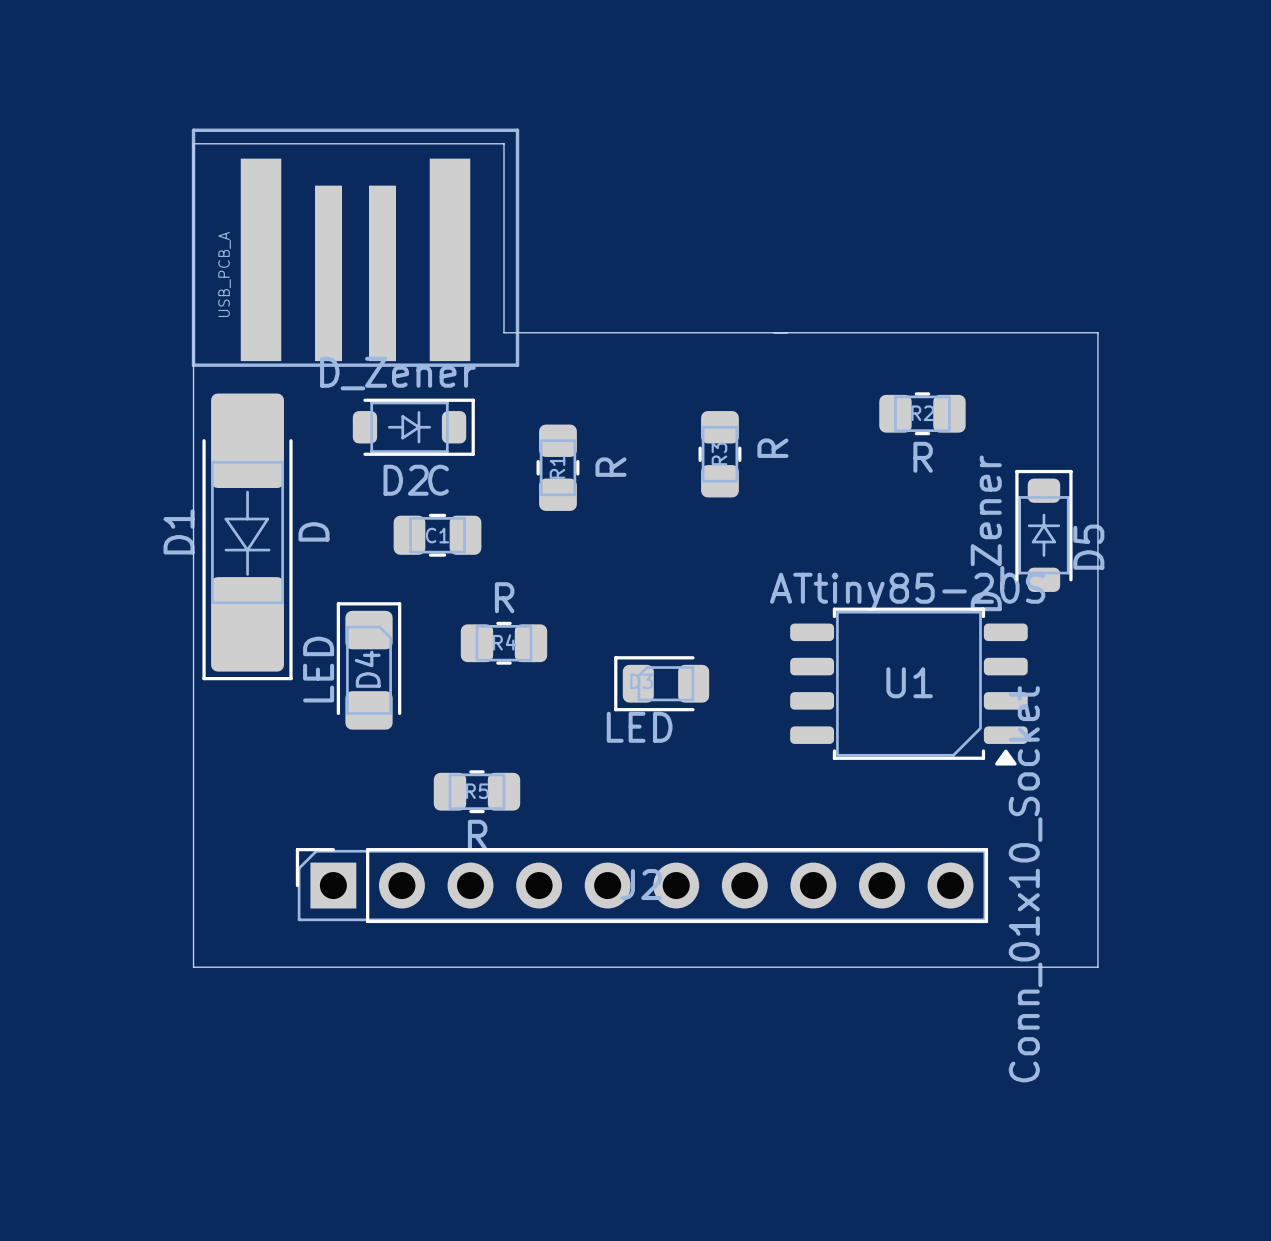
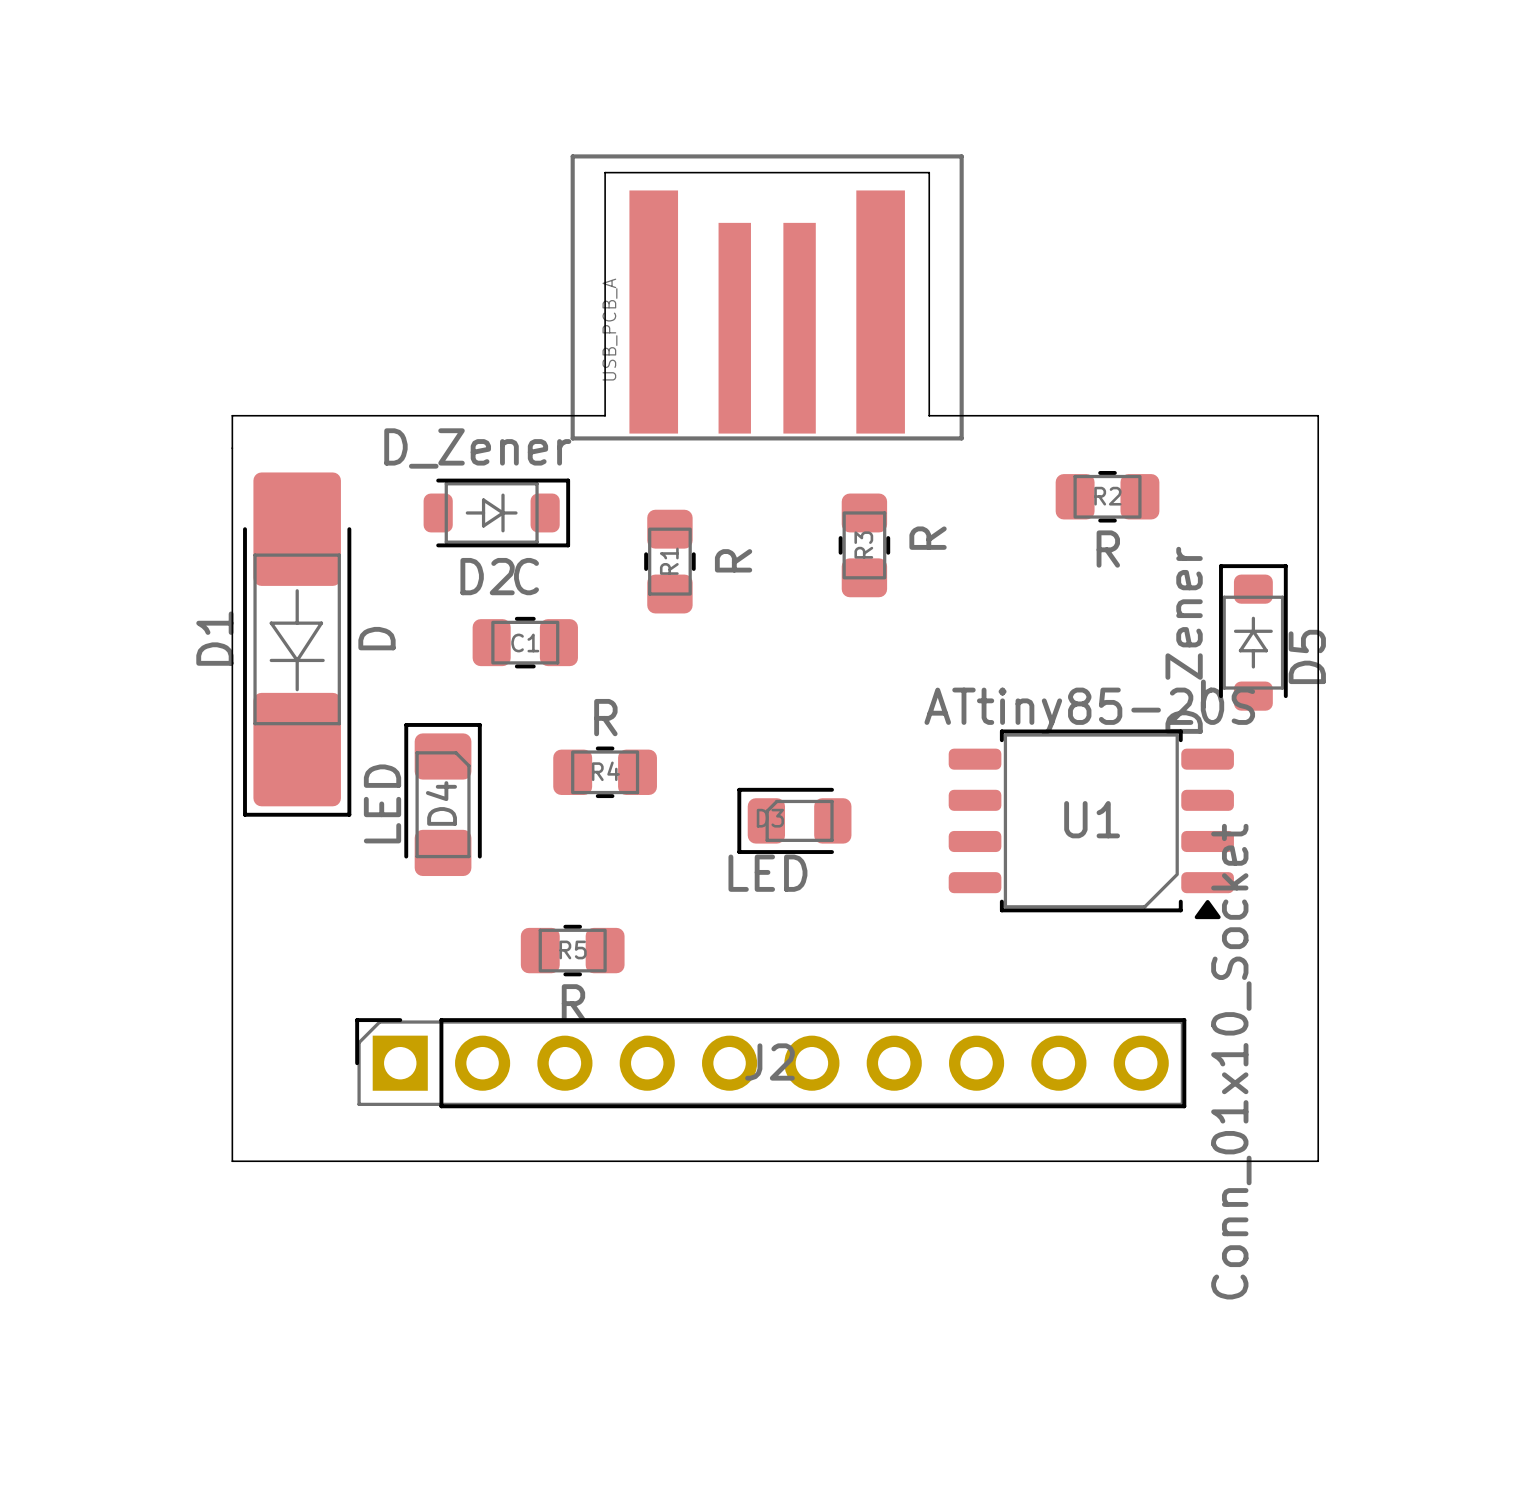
board edge: (503, 143) (193, 143) (193, 346) -> (605, 399) (605, 415) (232, 415)
part position: (355, 247) -> (767, 297)
board edge: (503, 332) (1097, 332) (1097, 346) -> (605, 172) (929, 172) (929, 415) (1318, 415)

